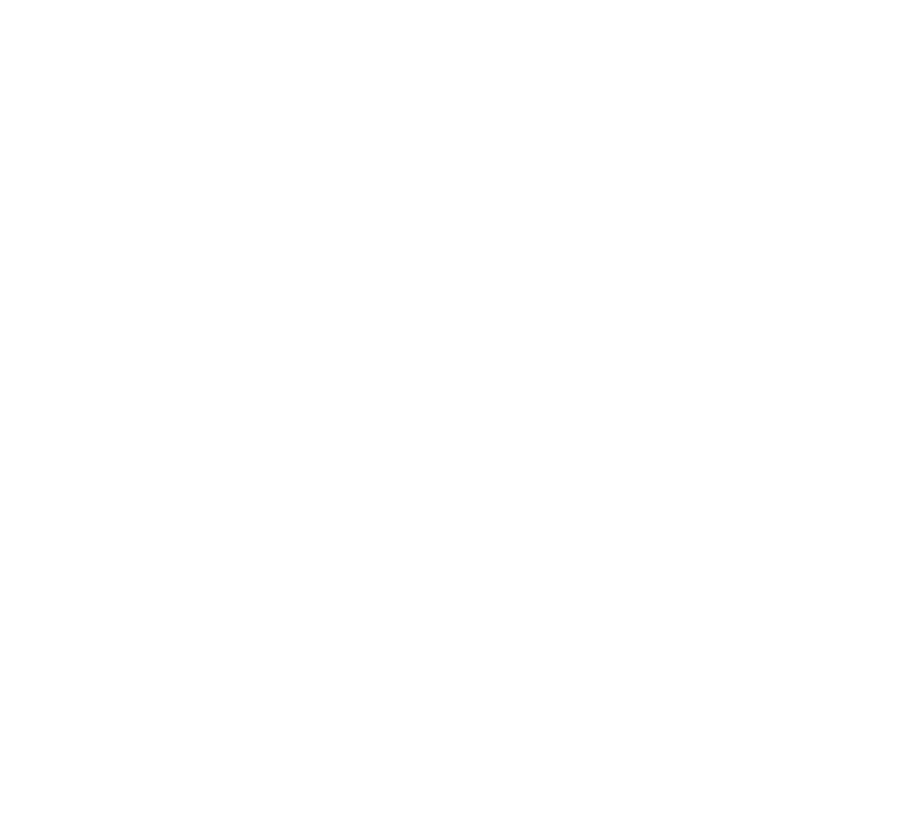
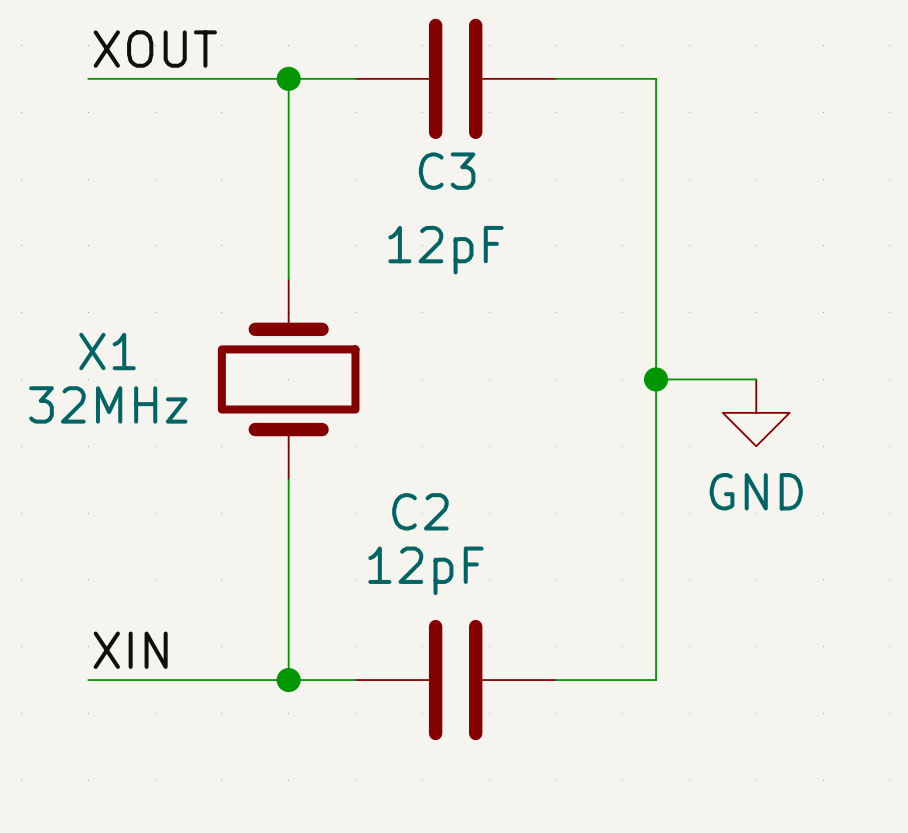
label: none -> XOUT (155, 49)
wire: none -> (88, 78) (355, 78)
wire: none -> (288, 78) (288, 279)
junction: none -> (288, 78)
C3: none -> 12pF (455, 78)
wire: none -> (555, 78) (656, 78) (656, 680) (555, 680)
X1: none -> 32MHz (288, 379)
wire: none -> (656, 379) (756, 379)
junction: none -> (656, 379)
power symbol: none -> GND (756, 412)
wire: none -> (288, 479) (288, 680)
label: none -> XIN (130, 650)
wire: none -> (88, 680) (355, 680)
junction: none -> (288, 680)
C2: none -> 12pF (455, 680)

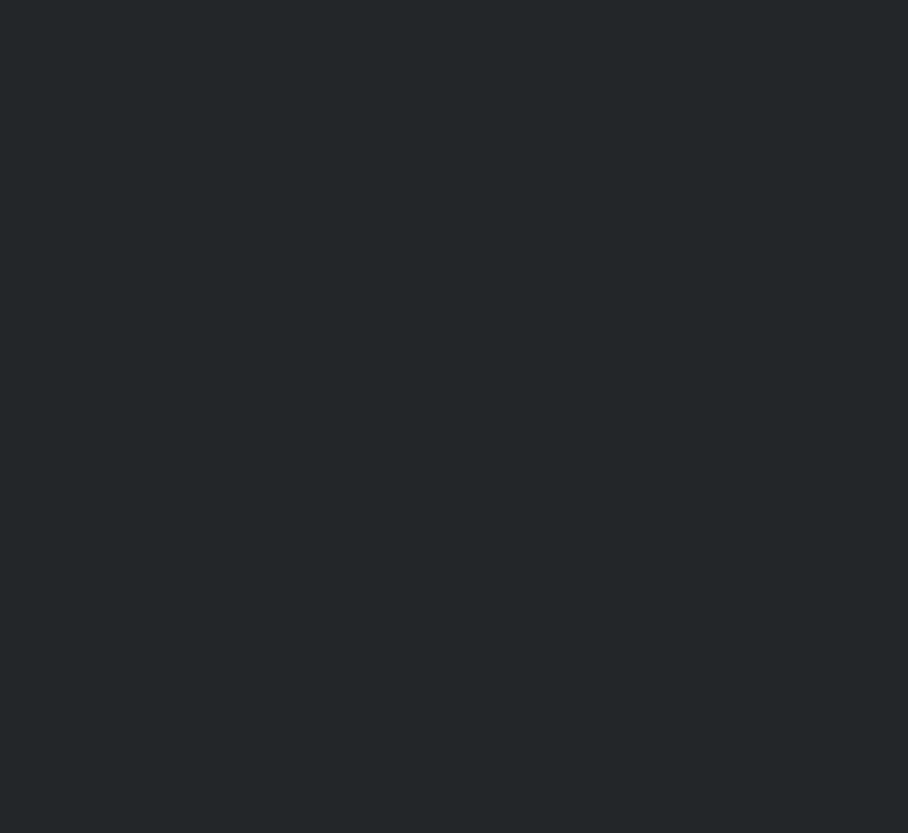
label: XOUT (155, 49) -> none
wire: (88, 78) (355, 78) -> none
wire: (288, 78) (288, 279) -> none
junction: (288, 78) -> none
C3: 12pF (455, 78) -> none
wire: (555, 78) (656, 78) (656, 680) (555, 680) -> none
X1: 32MHz (288, 379) -> none
wire: (656, 379) (756, 379) -> none
junction: (656, 379) -> none
power symbol: GND (756, 412) -> none
wire: (288, 479) (288, 680) -> none
label: XIN (130, 650) -> none
wire: (88, 680) (355, 680) -> none
junction: (288, 680) -> none
C2: 12pF (455, 680) -> none

